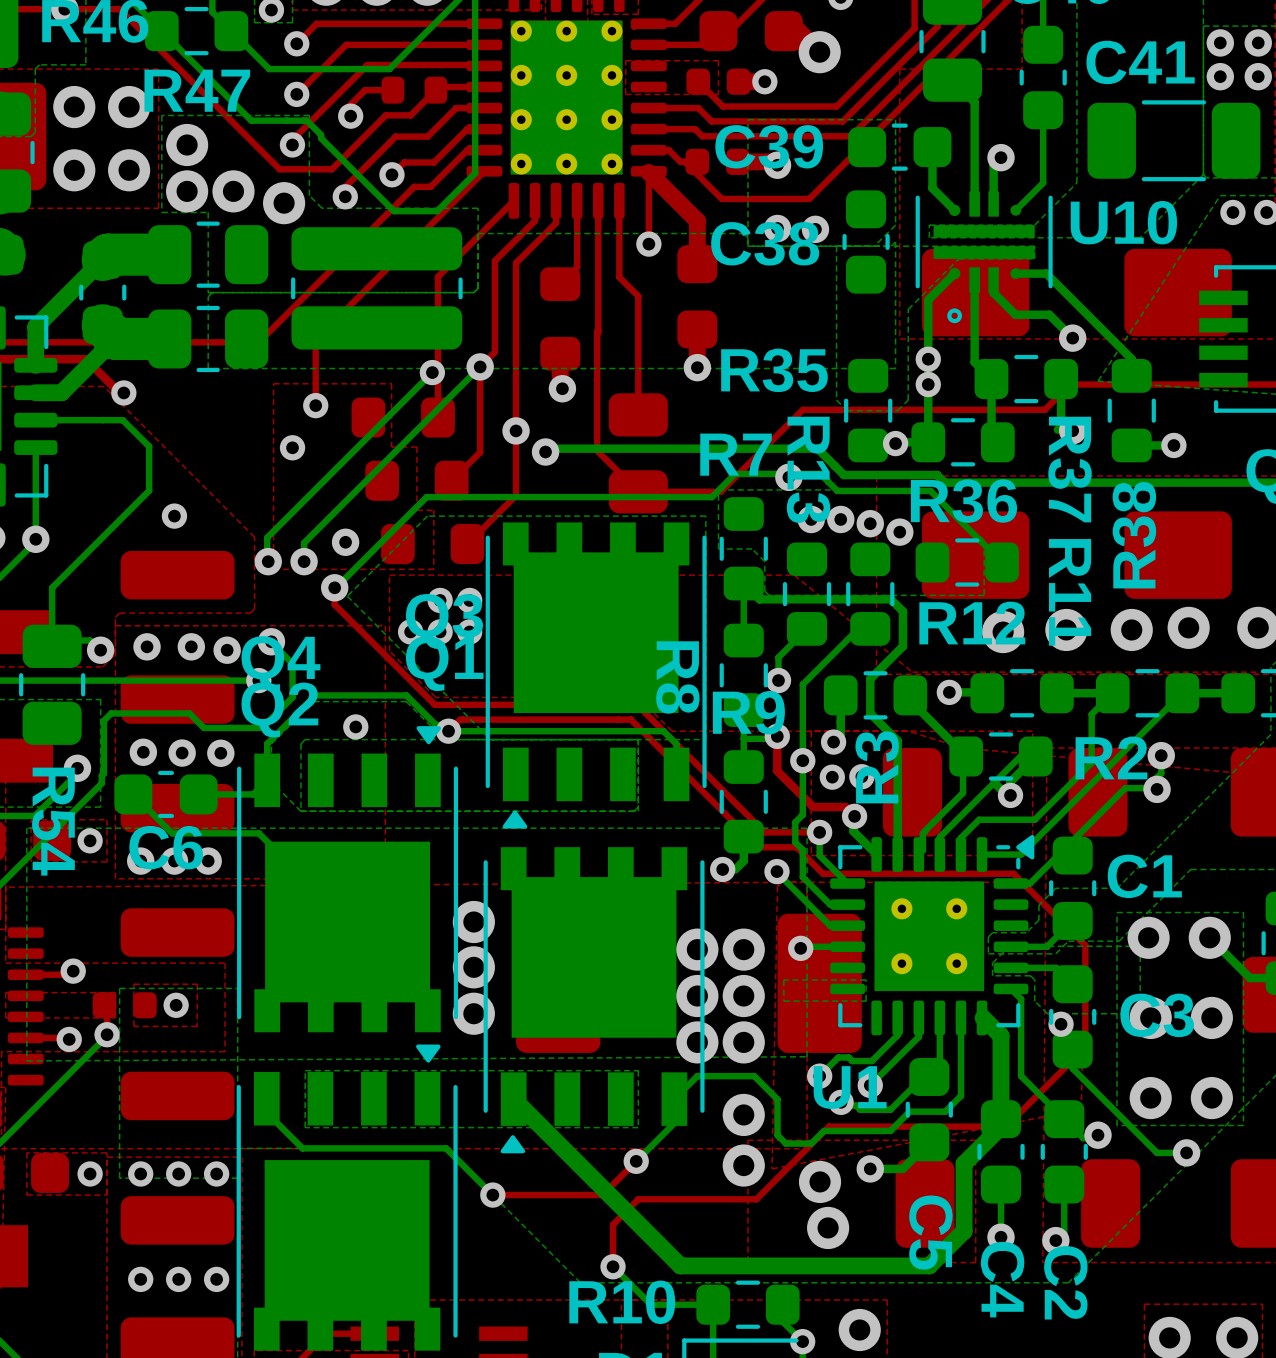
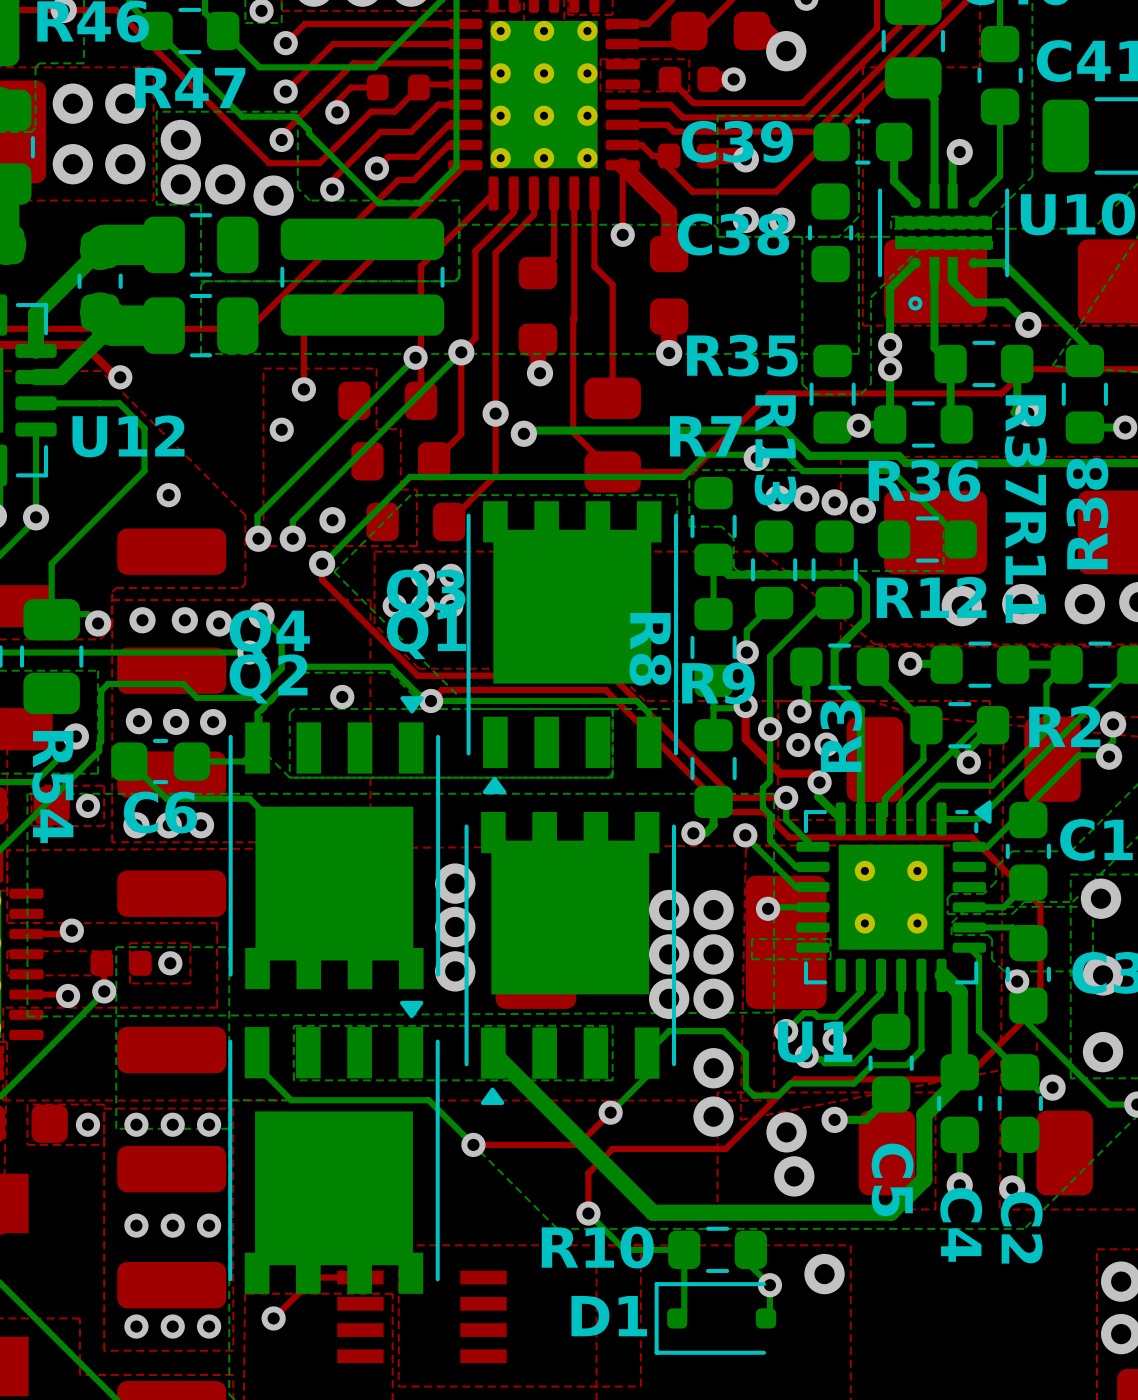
text: none -> U12 (128, 436)

